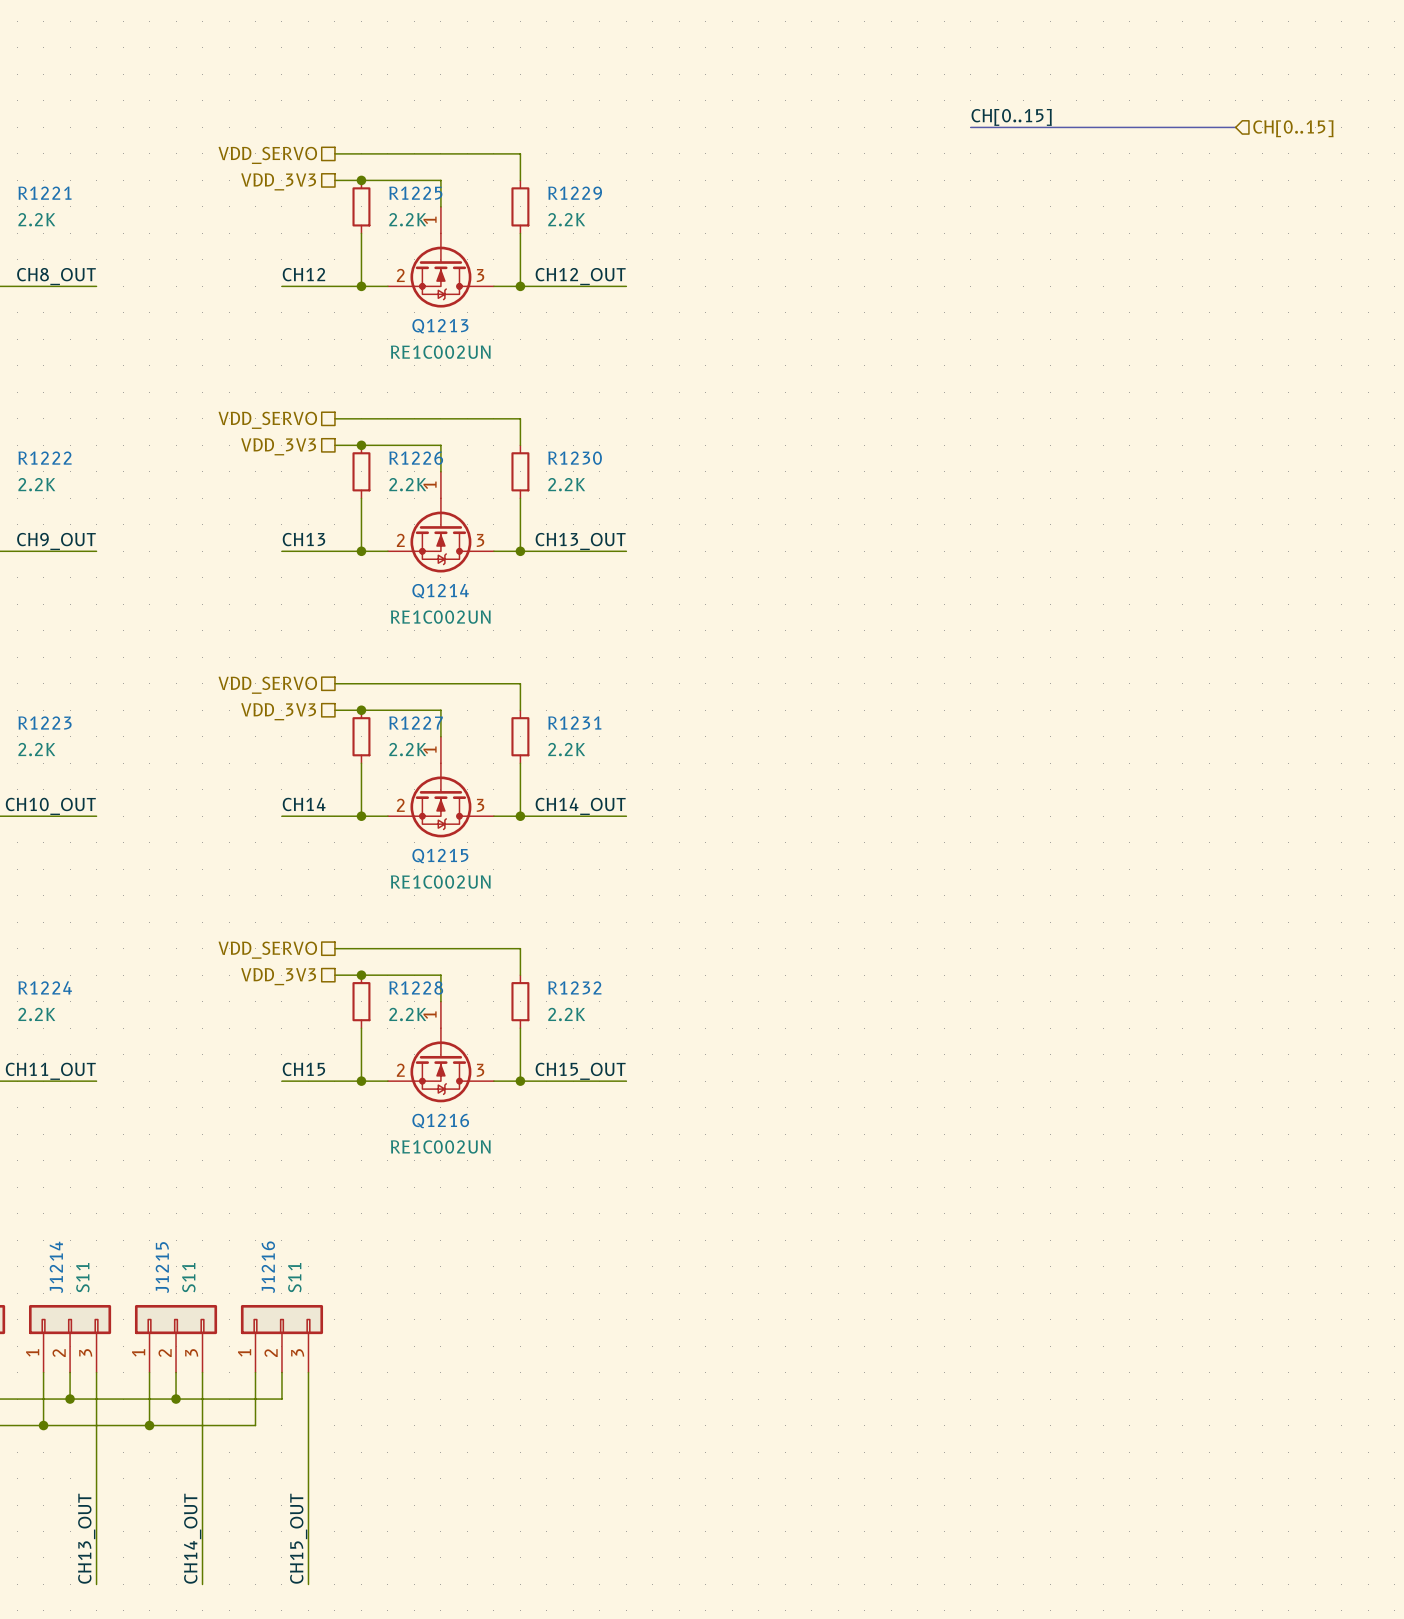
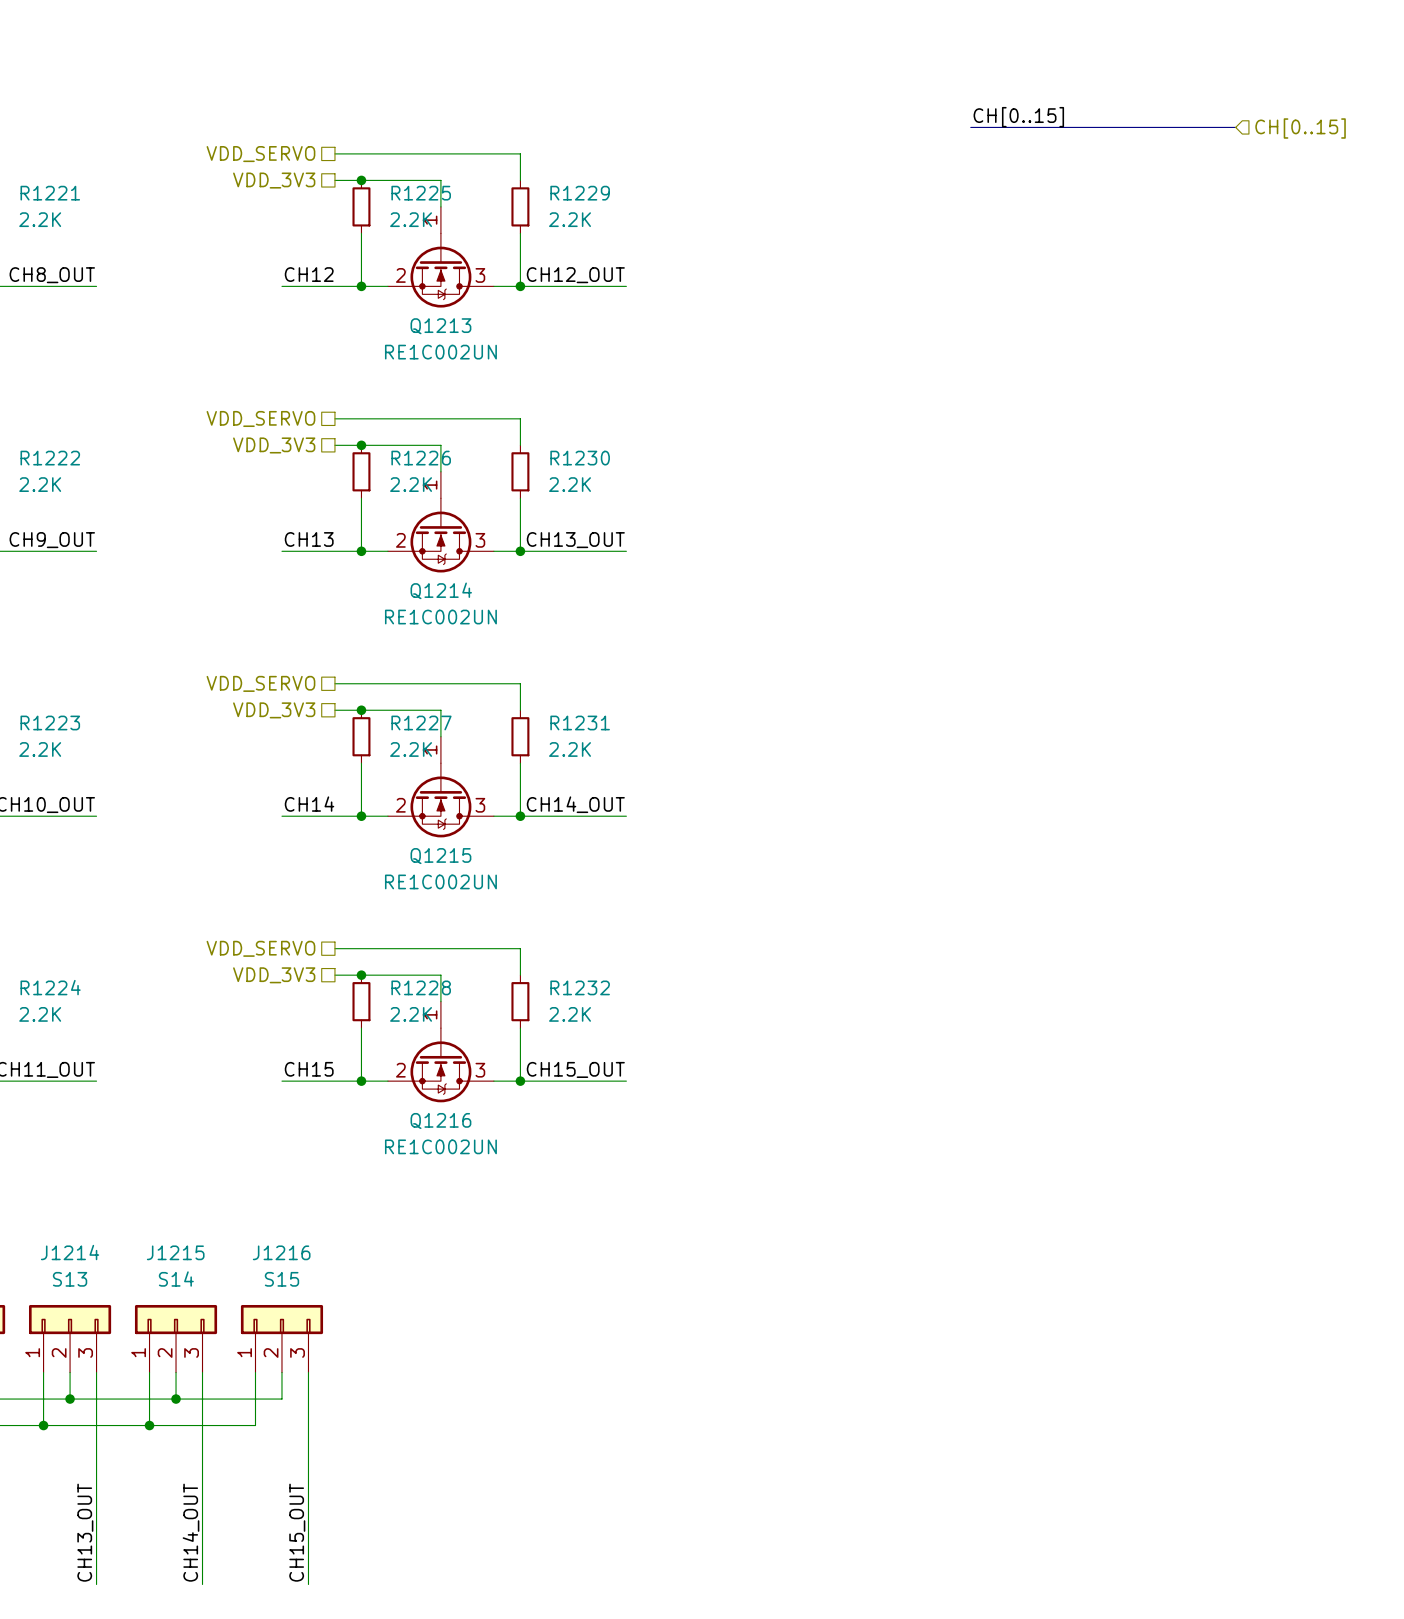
J1214 name rotation: 0° (56, 1267) -> 90° clockwise (70, 1252)
J1215 name rotation: 0° (162, 1267) -> 90° clockwise (175, 1252)
J1216 name rotation: 0° (268, 1267) -> 90° clockwise (281, 1252)
J1214 value: S11 (82, 1277) -> S13 (70, 1279)
J1215 value: S11 (188, 1277) -> S14 (176, 1279)
J1216 value: S11 (294, 1277) -> S15 (281, 1279)

